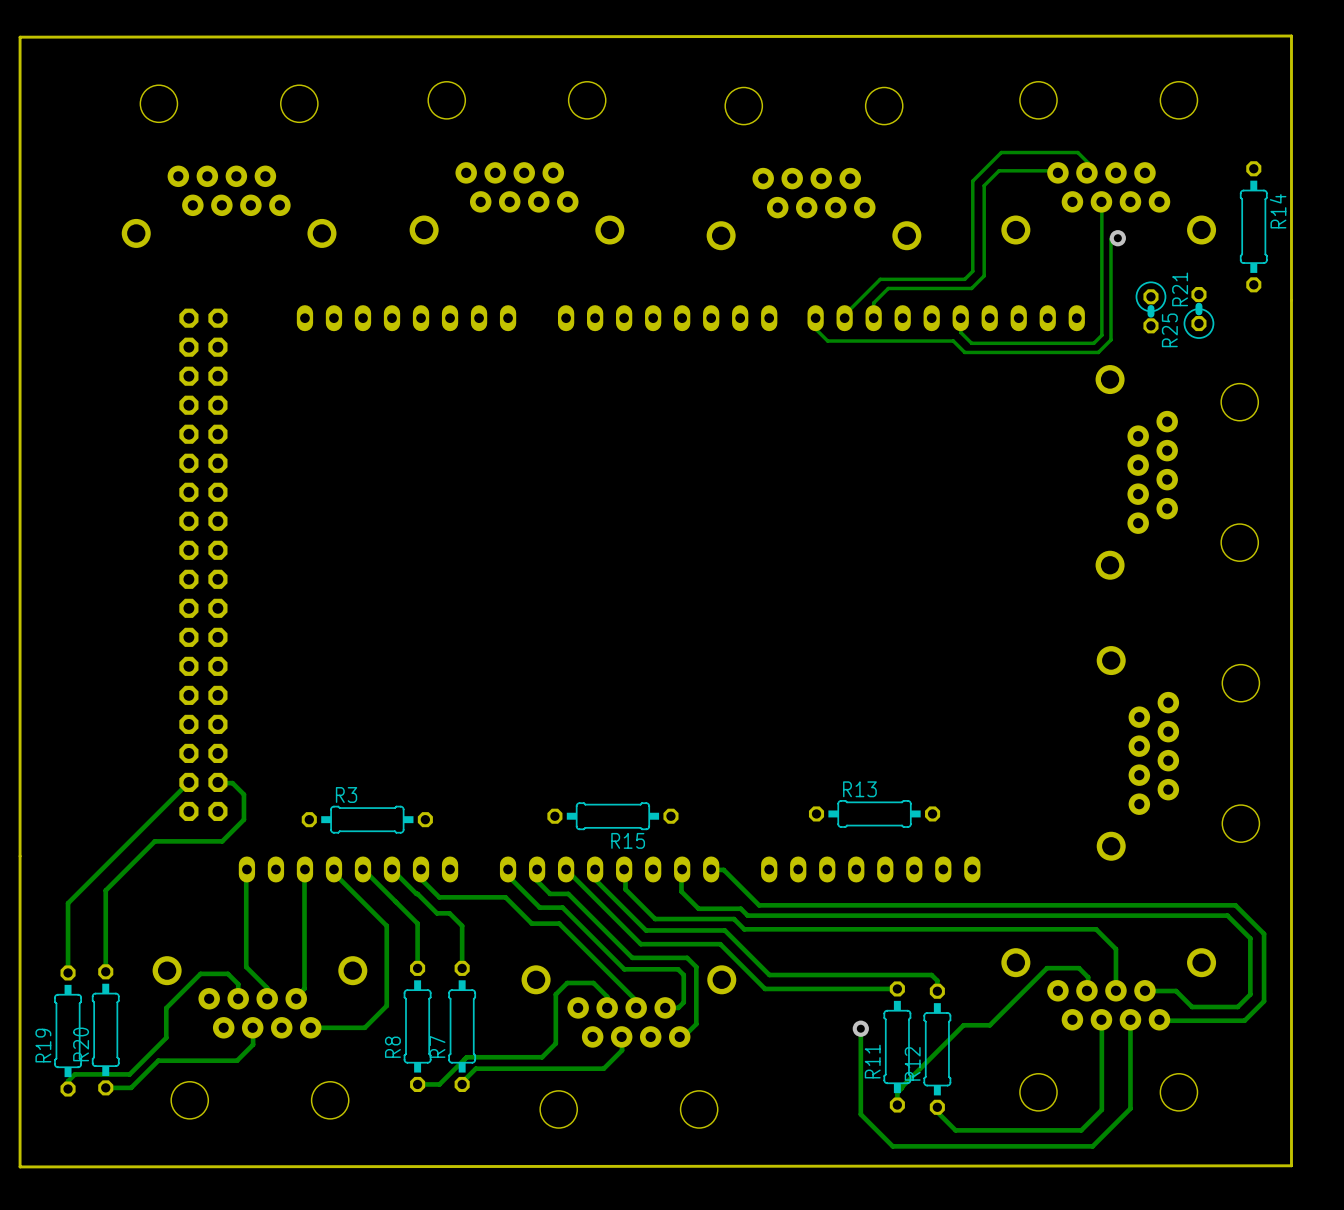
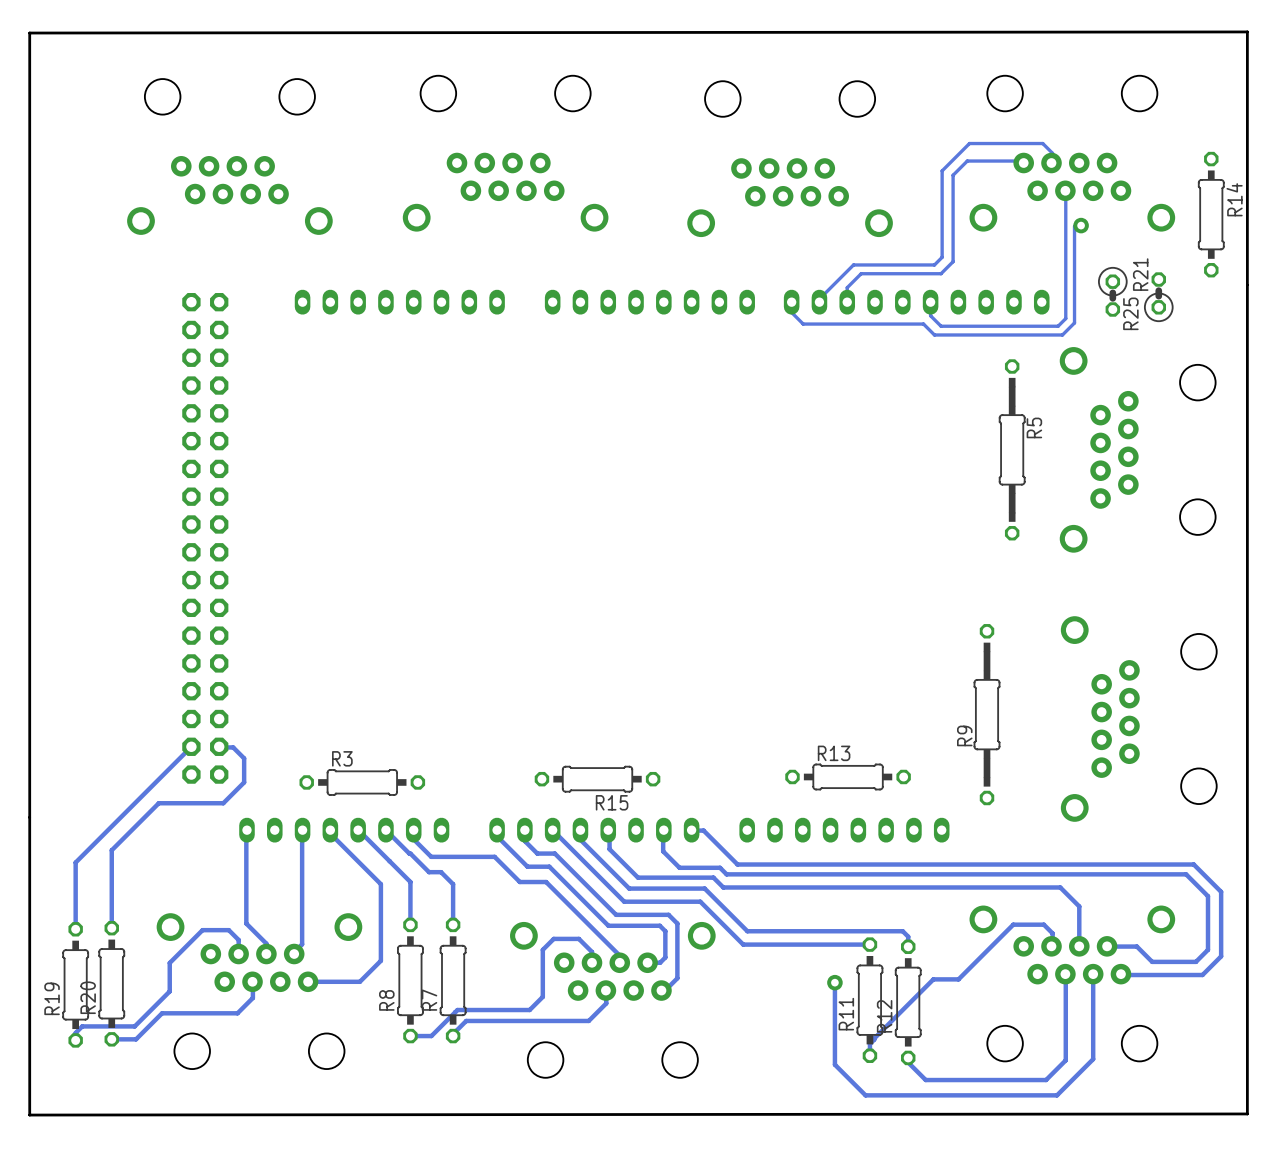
R5: none -> (1012, 449)
R9: none -> (987, 714)

